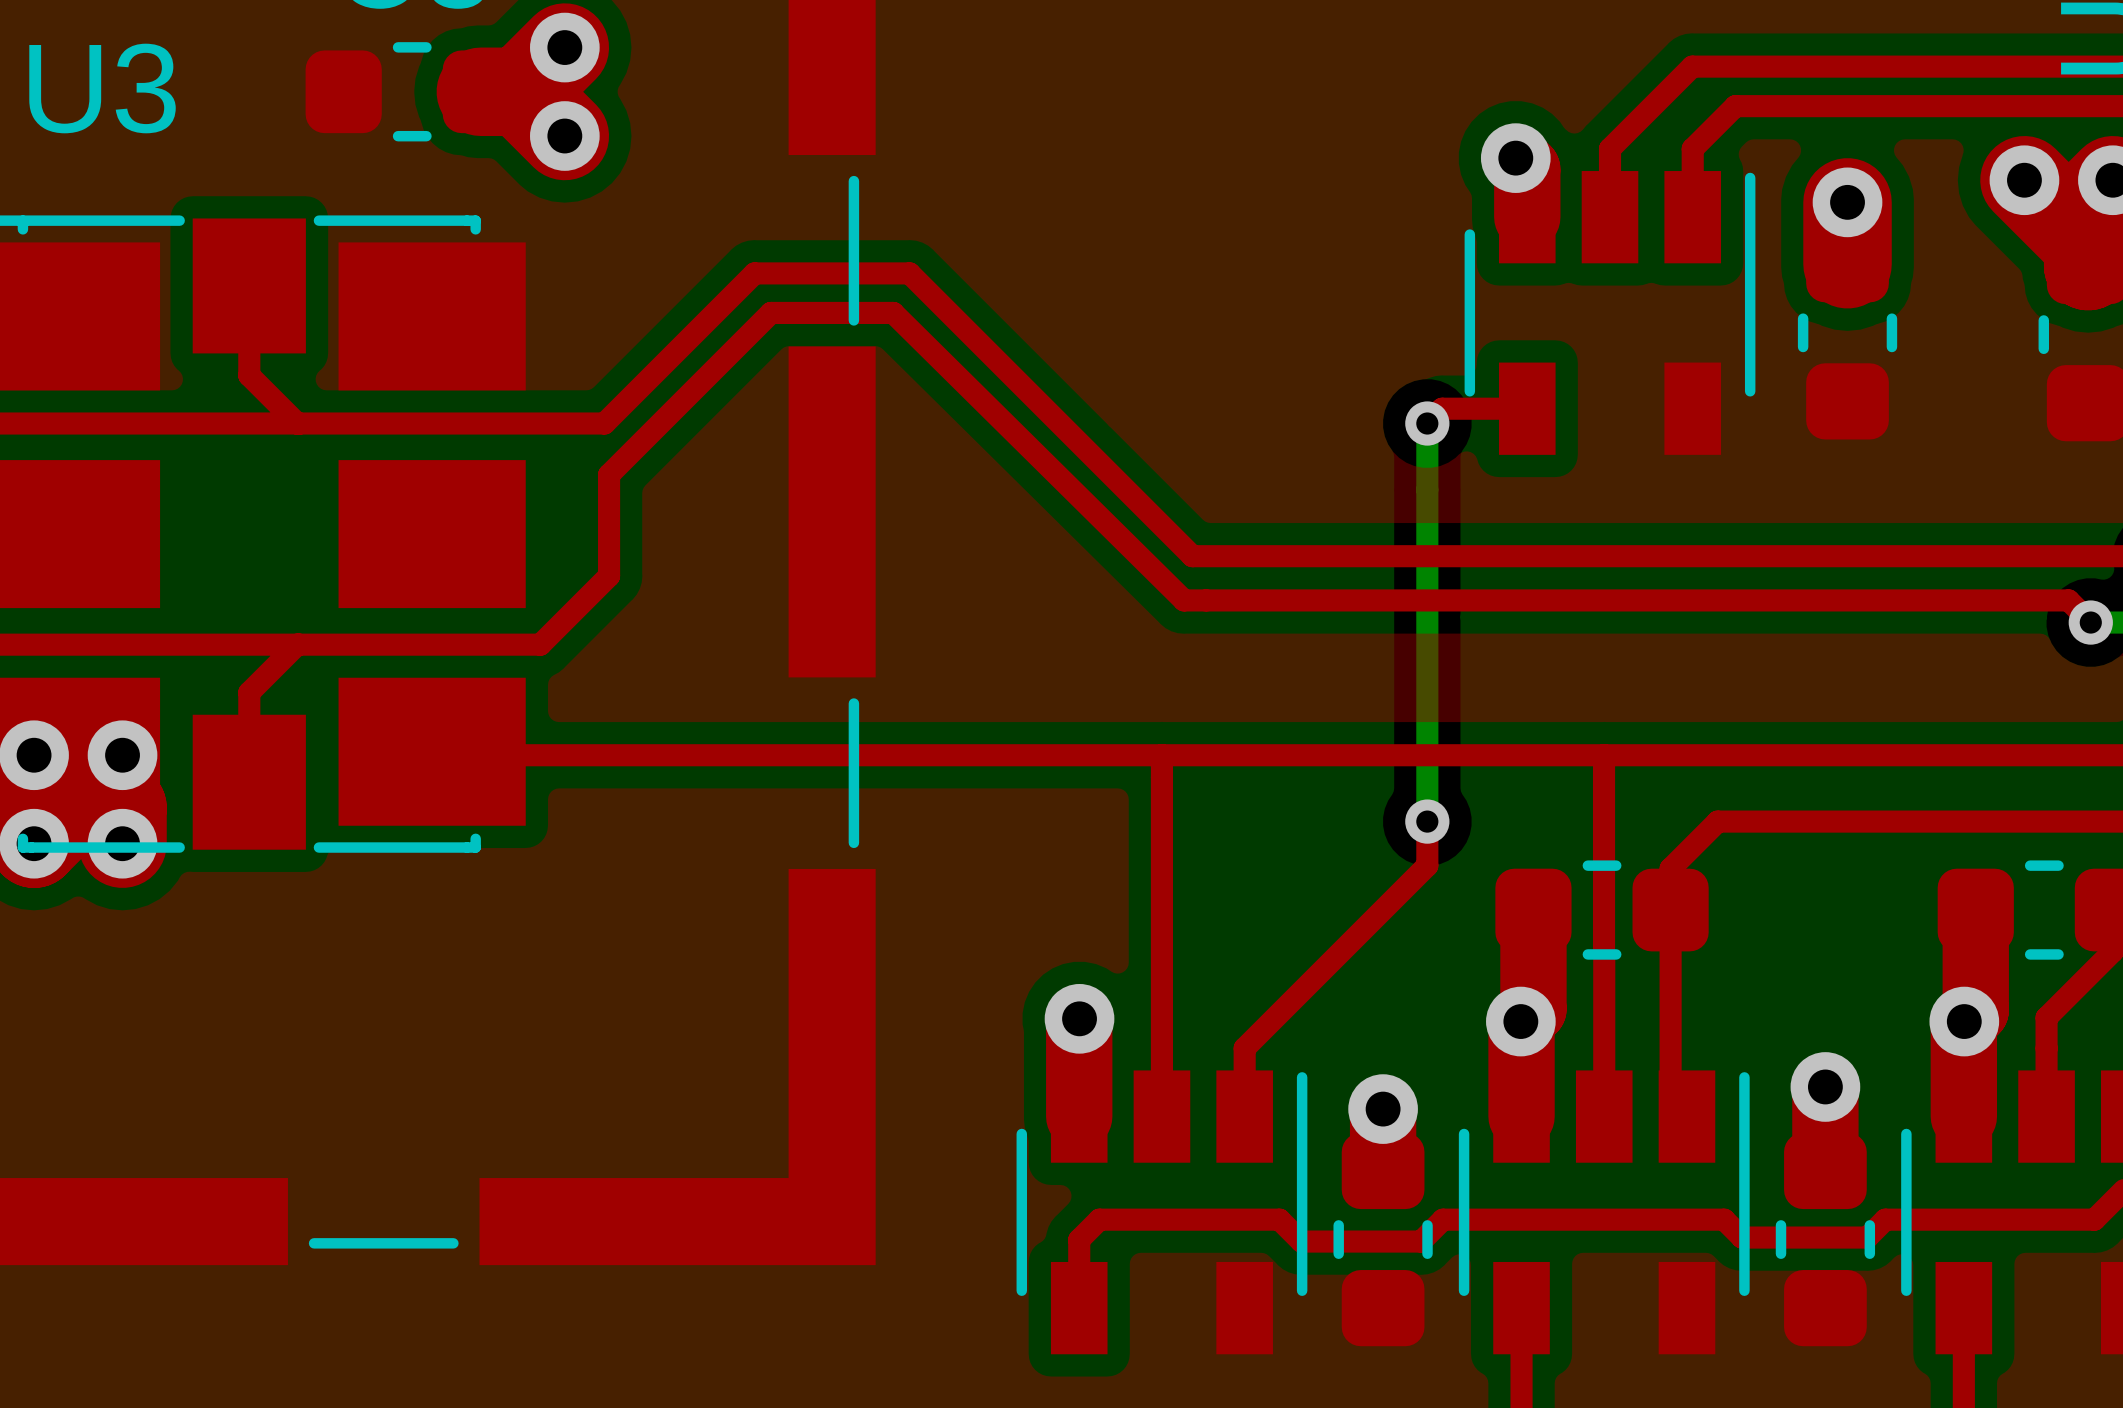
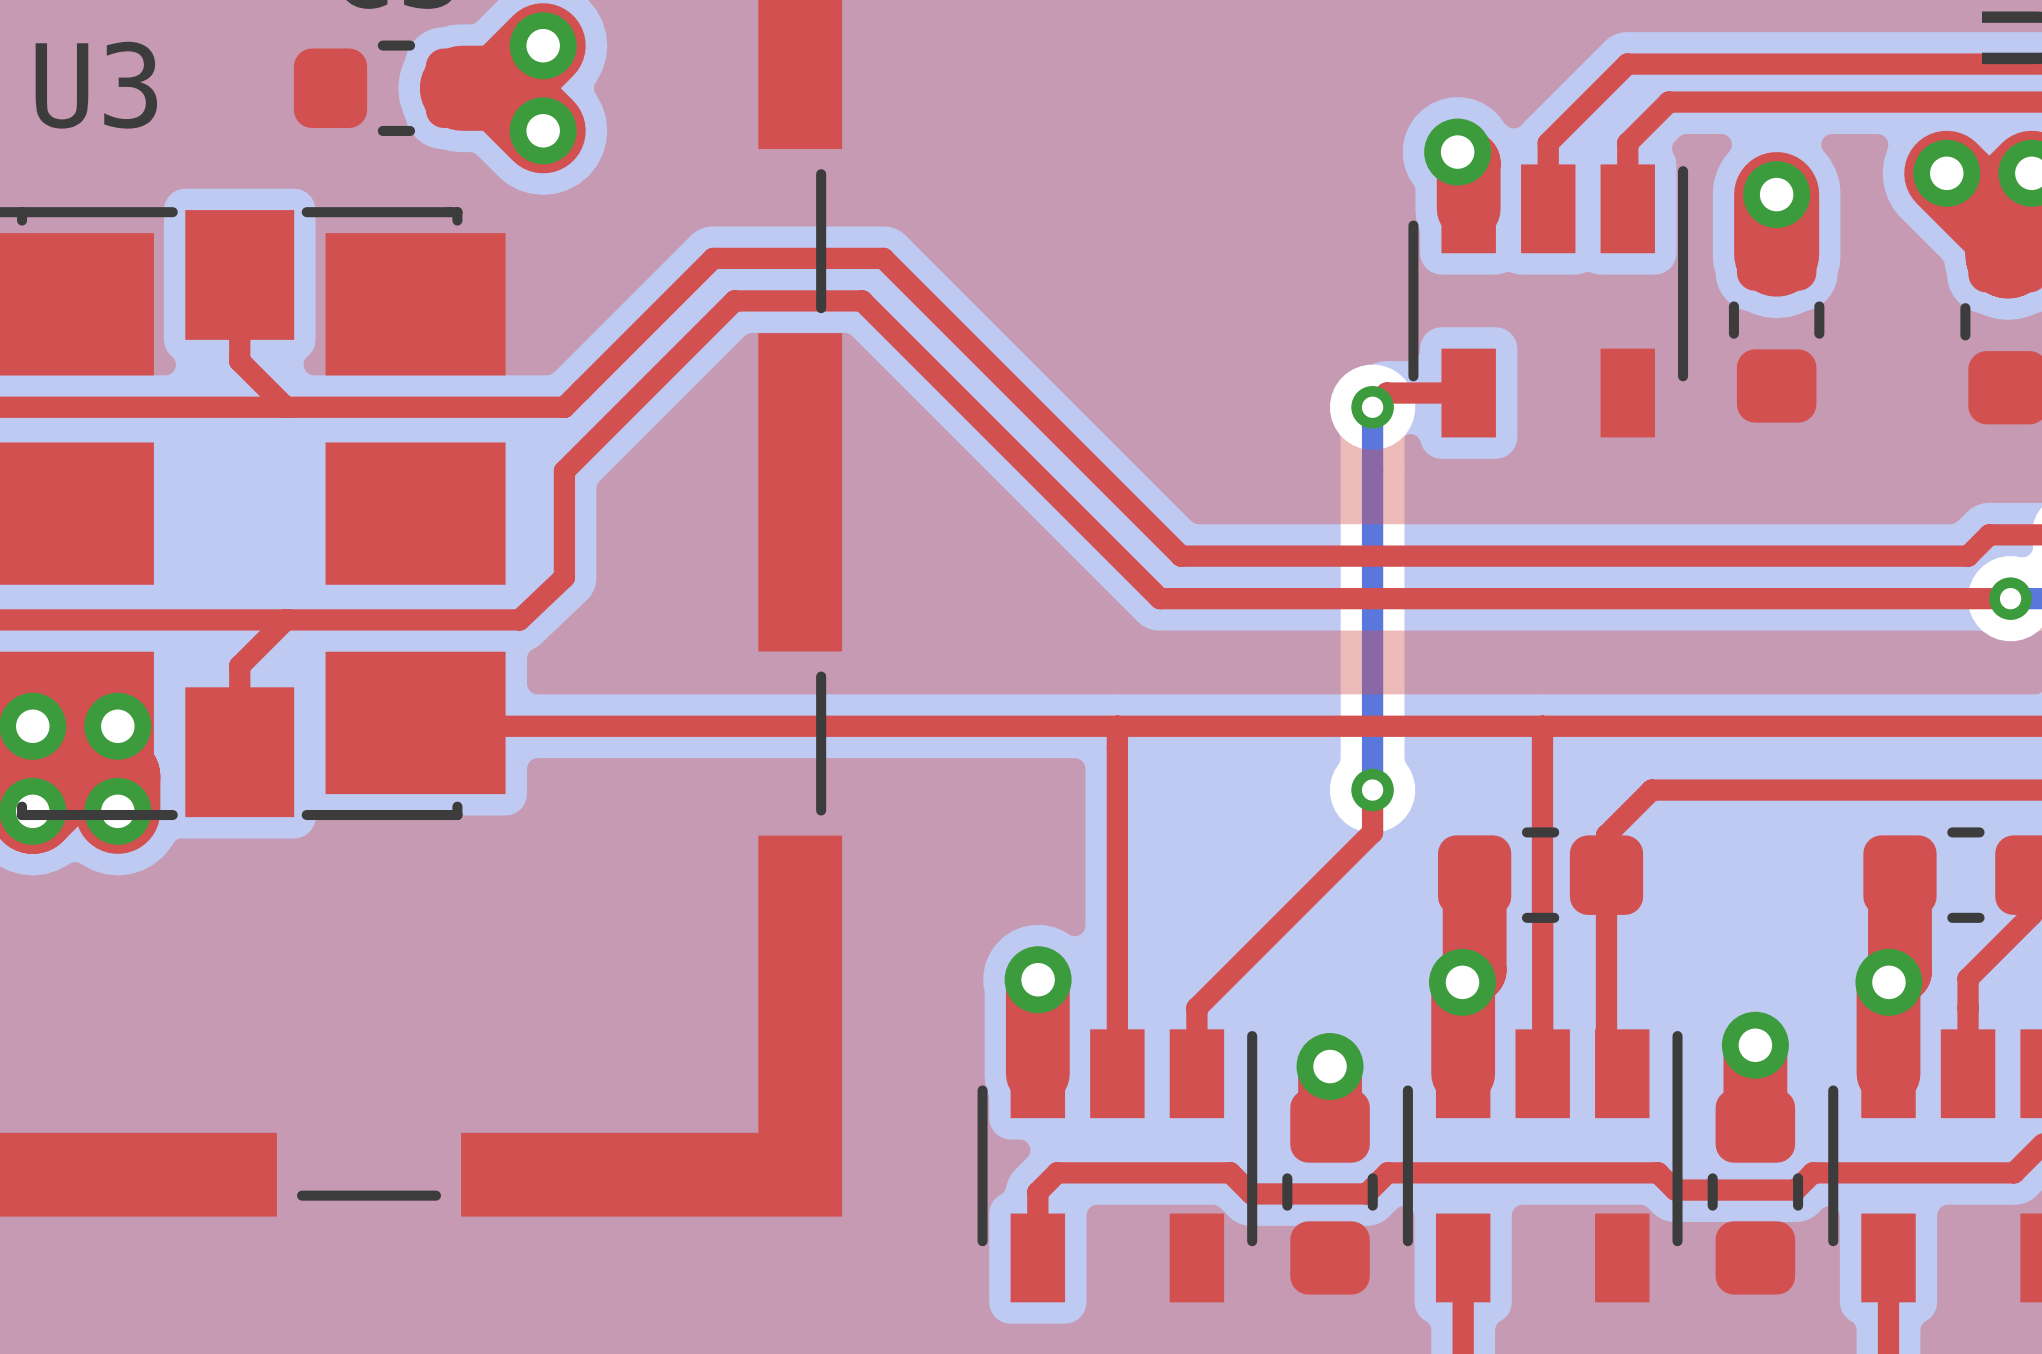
top track: (770, 312) (609, 474) (609, 576) (540, 644) -> (741, 300) (734, 300) (564, 471) (564, 577) (519, 619)
top track: (893, 312) (1184, 600) (2068, 600) (2090, 622) -> (859, 300) (862, 300) (1159, 598) (2010, 598)
top track: (586, 423) (604, 423) (754, 273) (909, 273) (1192, 556) (2068, 556) -> (564, 407) (713, 258) (883, 258) (1181, 556) (1968, 556) (1989, 534)

